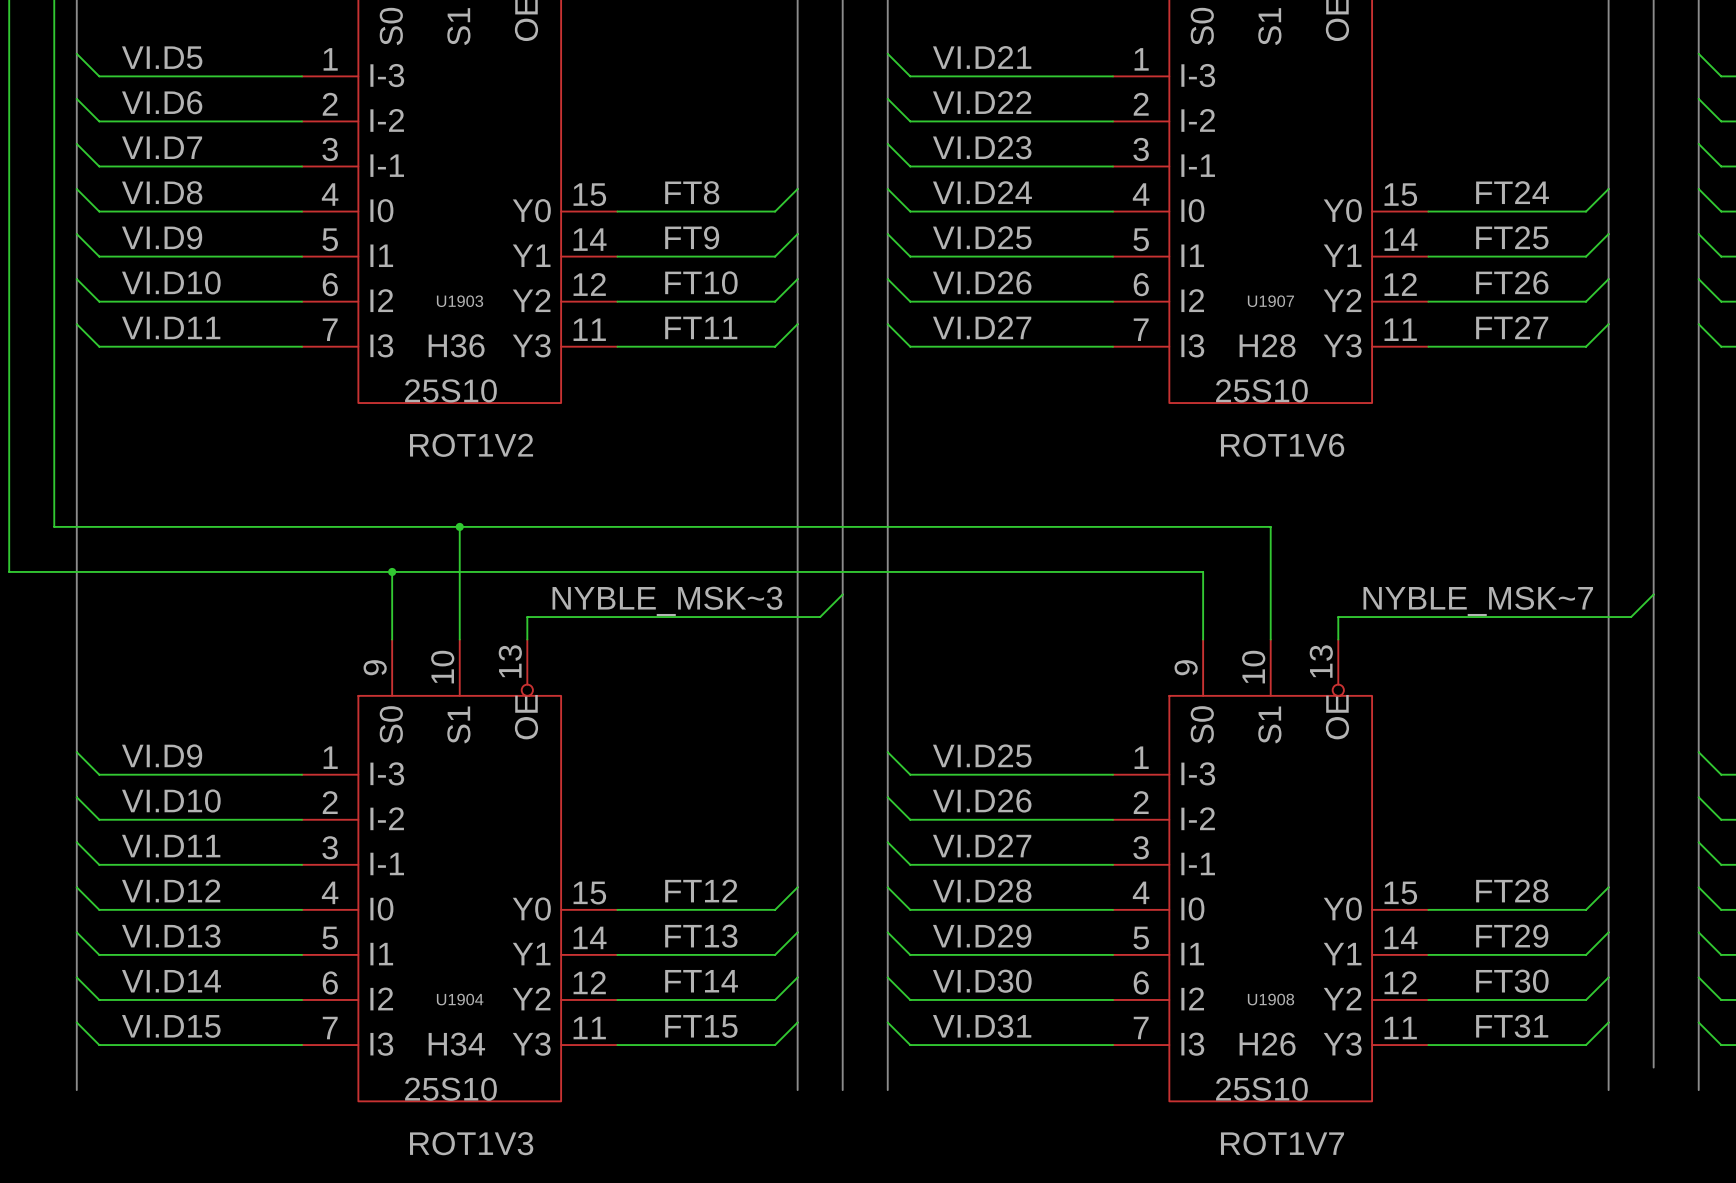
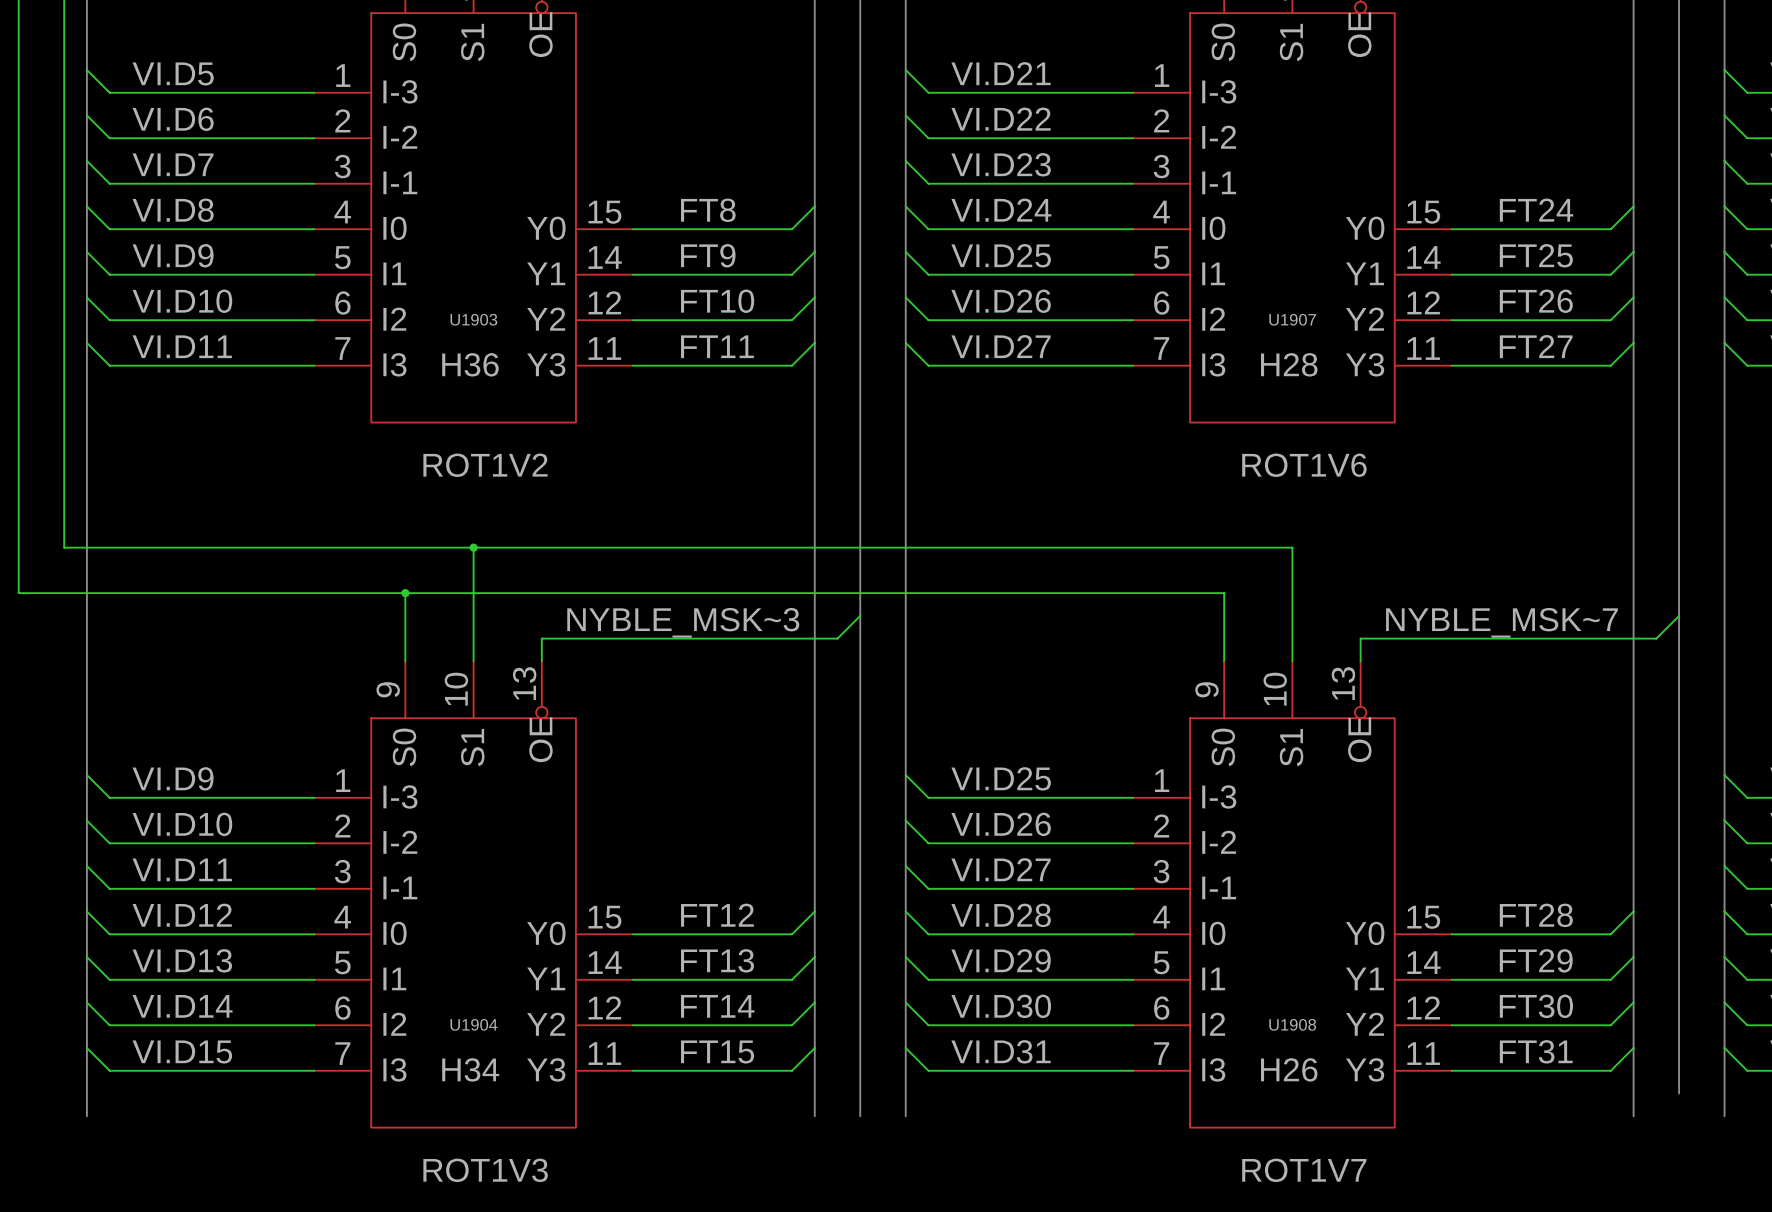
U1903 value: 25S10 (450, 390) -> none
U1907 value: 25S10 (1261, 390) -> none
U1904 value: 25S10 (450, 1089) -> none
U1908 value: 25S10 (1261, 1089) -> none

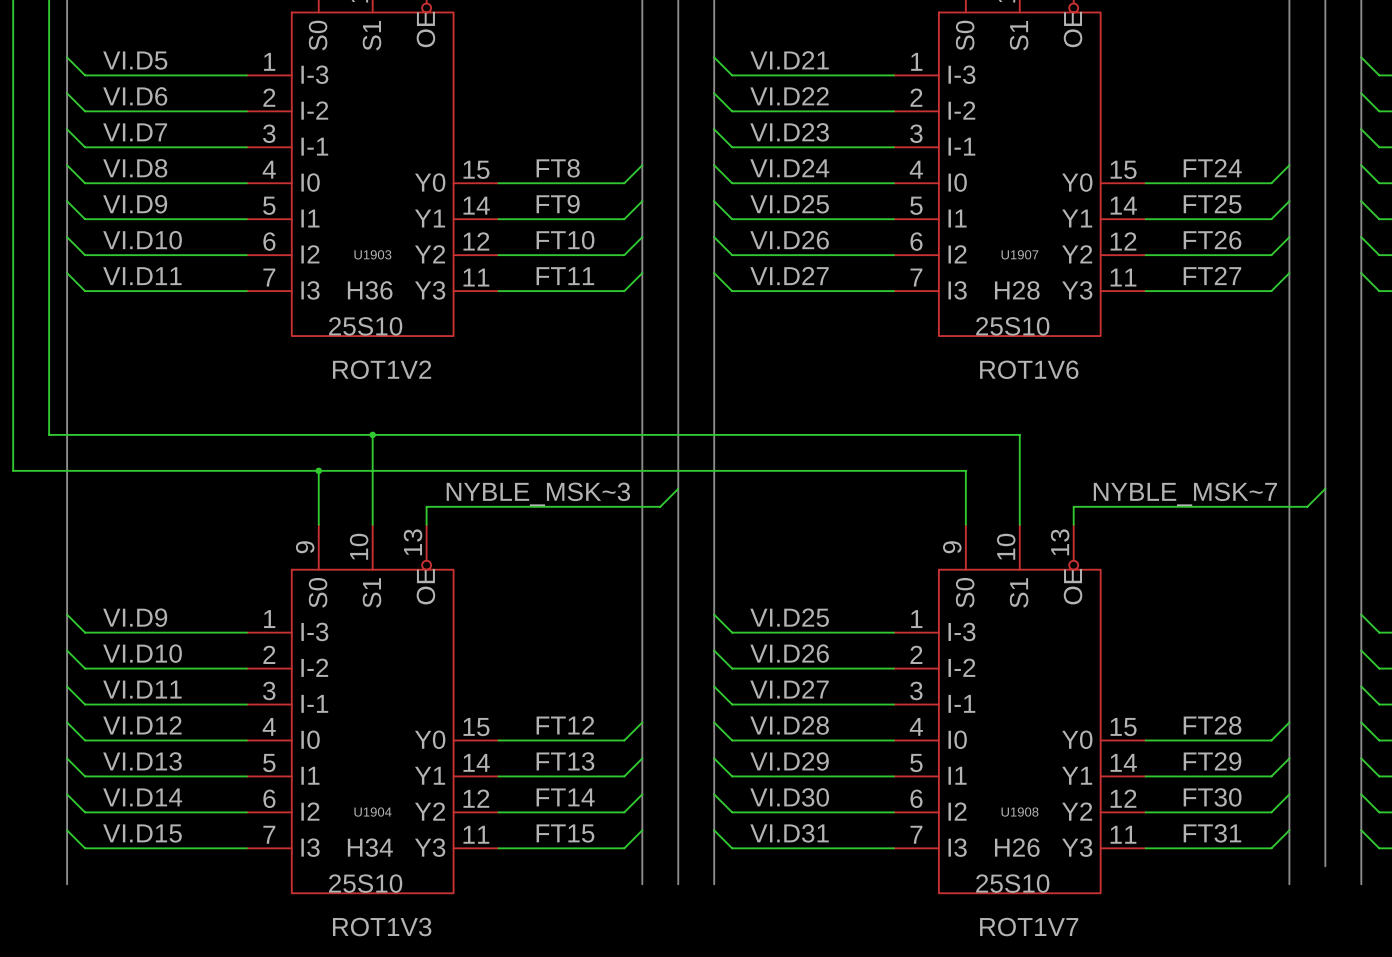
U1903 value: none -> 25S10 (365, 326)
U1907 value: none -> 25S10 (1012, 326)
U1904 value: none -> 25S10 (365, 883)
U1908 value: none -> 25S10 (1012, 883)

